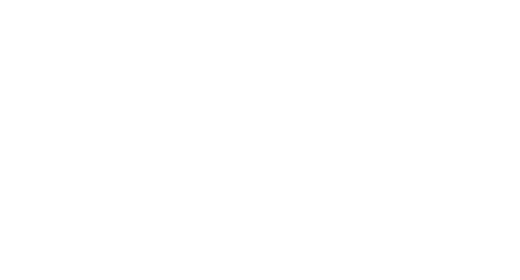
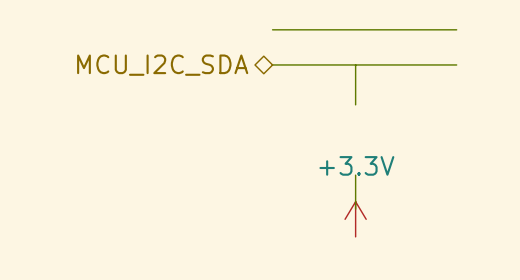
wire: none -> (272, 29) (456, 29)
wire: none -> (272, 64) (456, 64)
wire: none -> (355, 64) (355, 104)
hierarchical label: none -> MCU_I2C_SDA (162, 65)
wire: none -> (355, 175) (355, 209)
power symbol: none -> +3.3V (355, 219)

